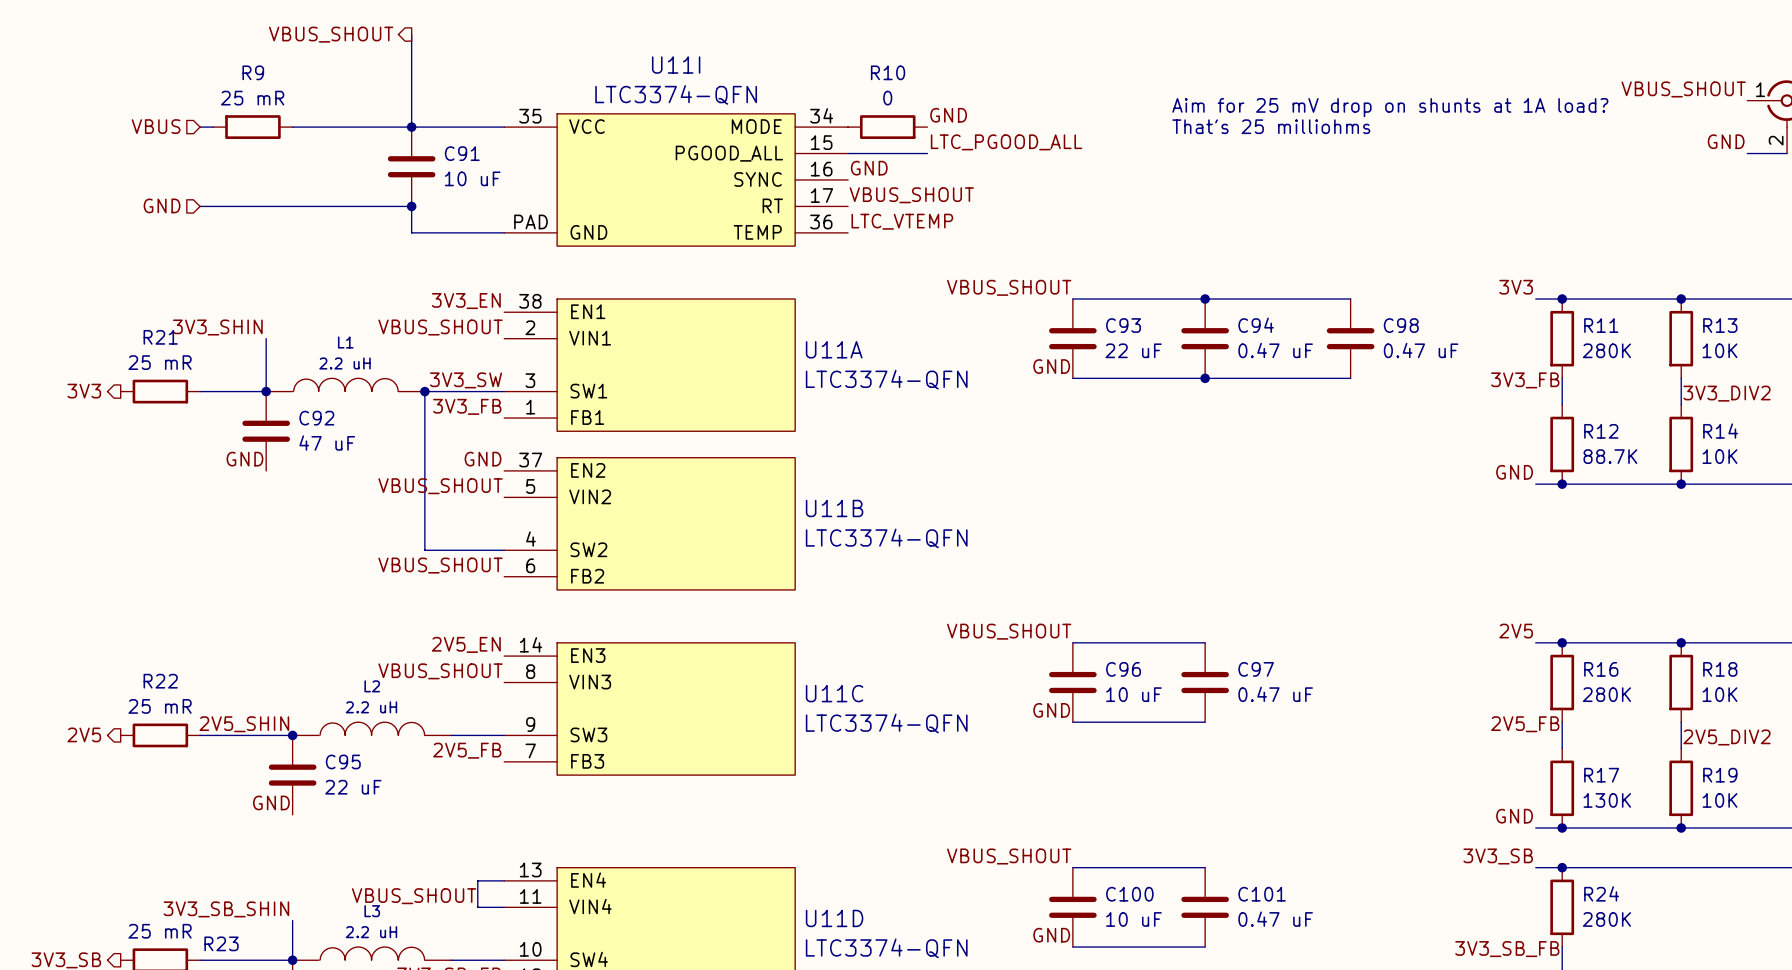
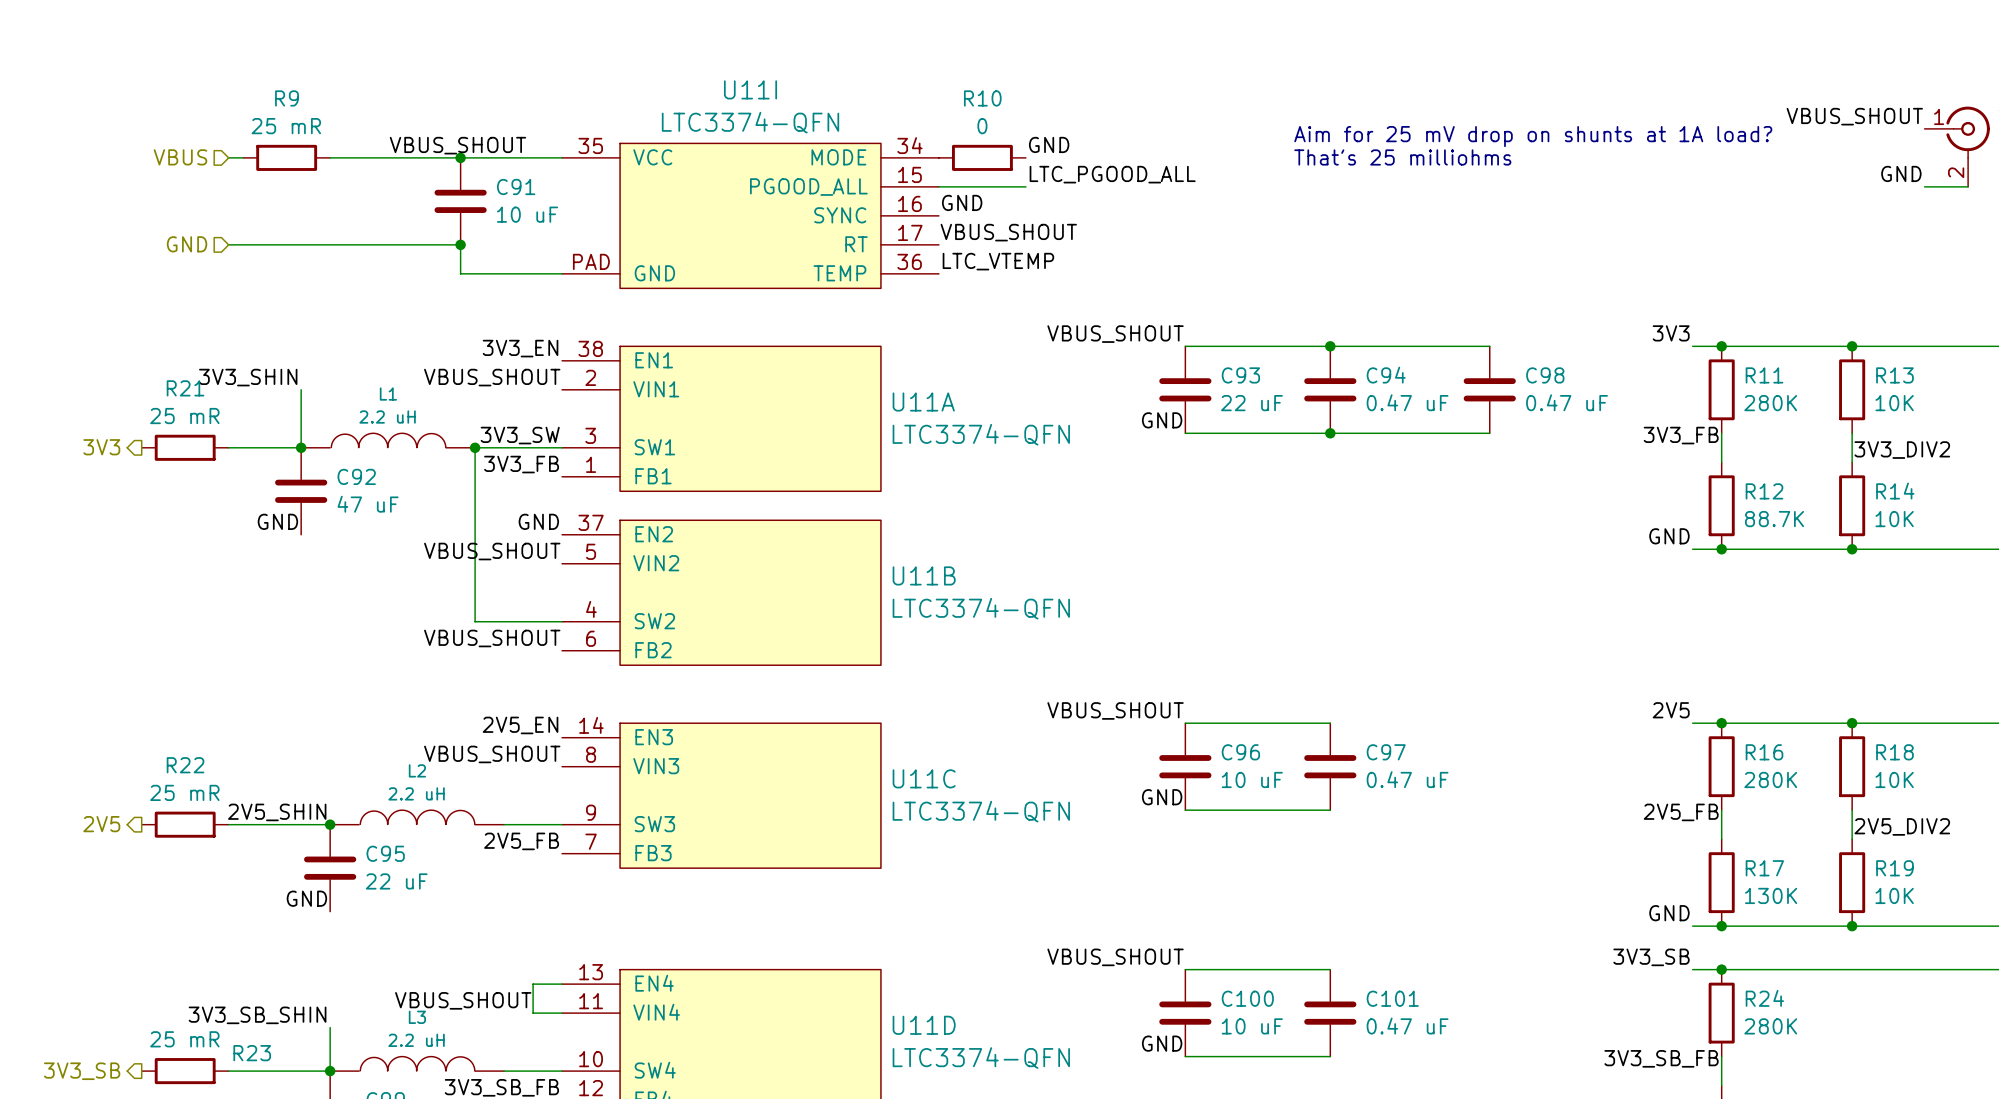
hierarchical label: VBUS_SHOUT (331, 34) -> none
wire: (411, 34) (411, 127) -> none
label: none -> VBUS_SHOUT (457, 145)

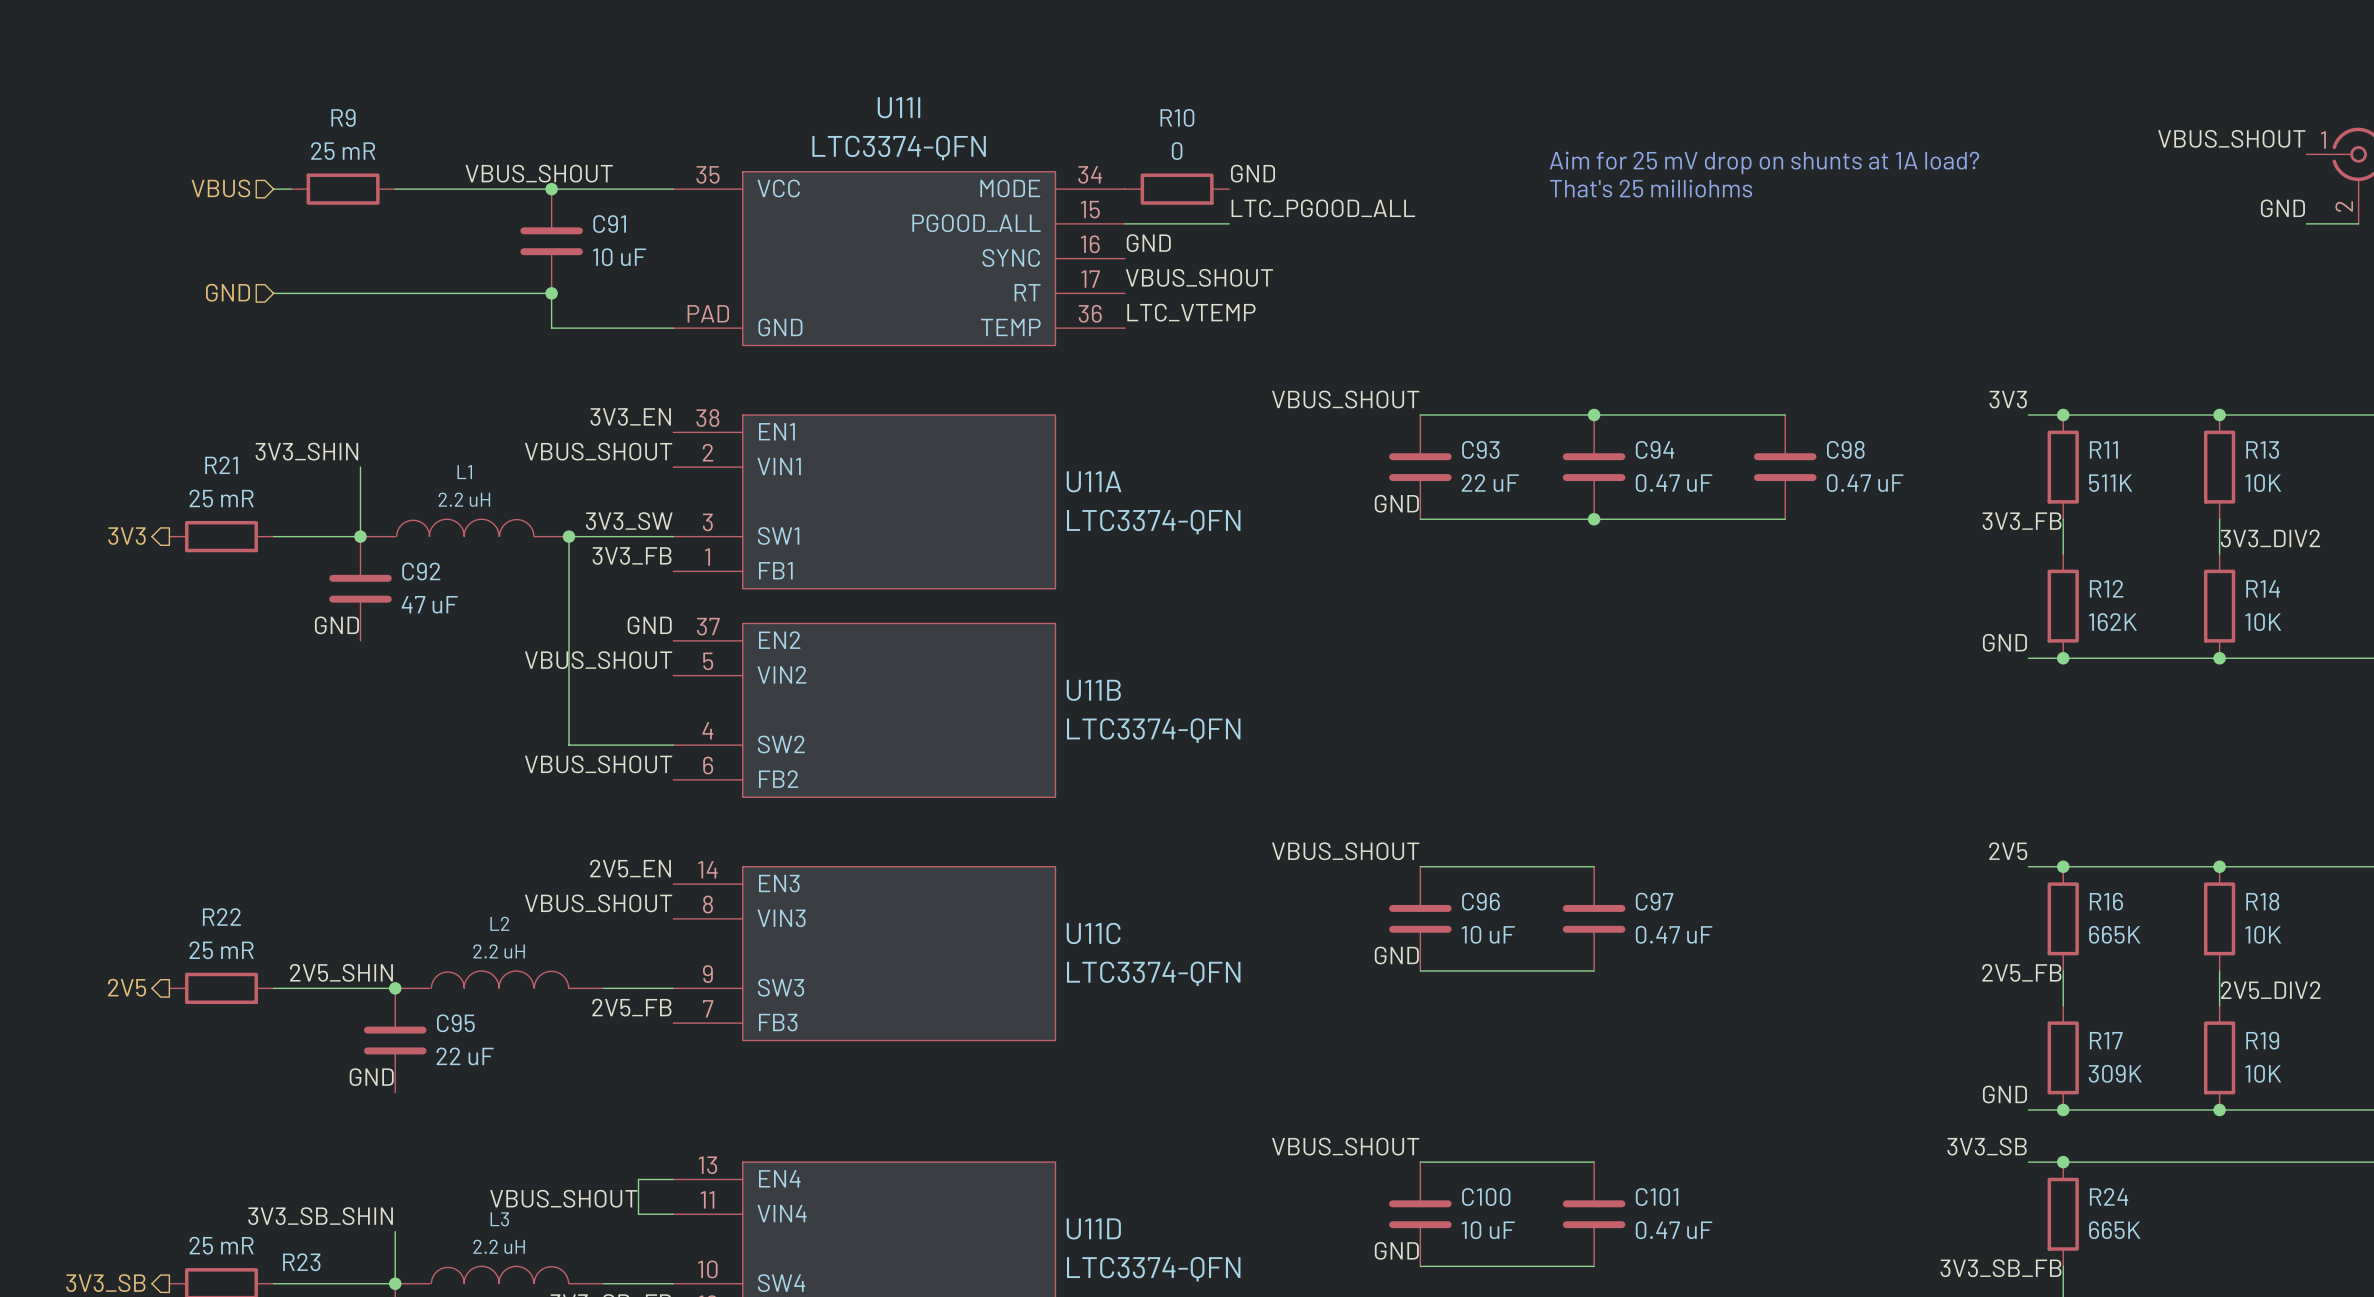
R11 value: 280K (1770, 403) -> 511K (2110, 483)
R12 value: 88.7K (1774, 519) -> 162K (2112, 622)
R16 value: 280K (1770, 779) -> 665K (2114, 934)
R17 value: 130K (1771, 895) -> 309K (2115, 1073)
R24 value: 280K (1770, 1026) -> 665K (2114, 1230)

